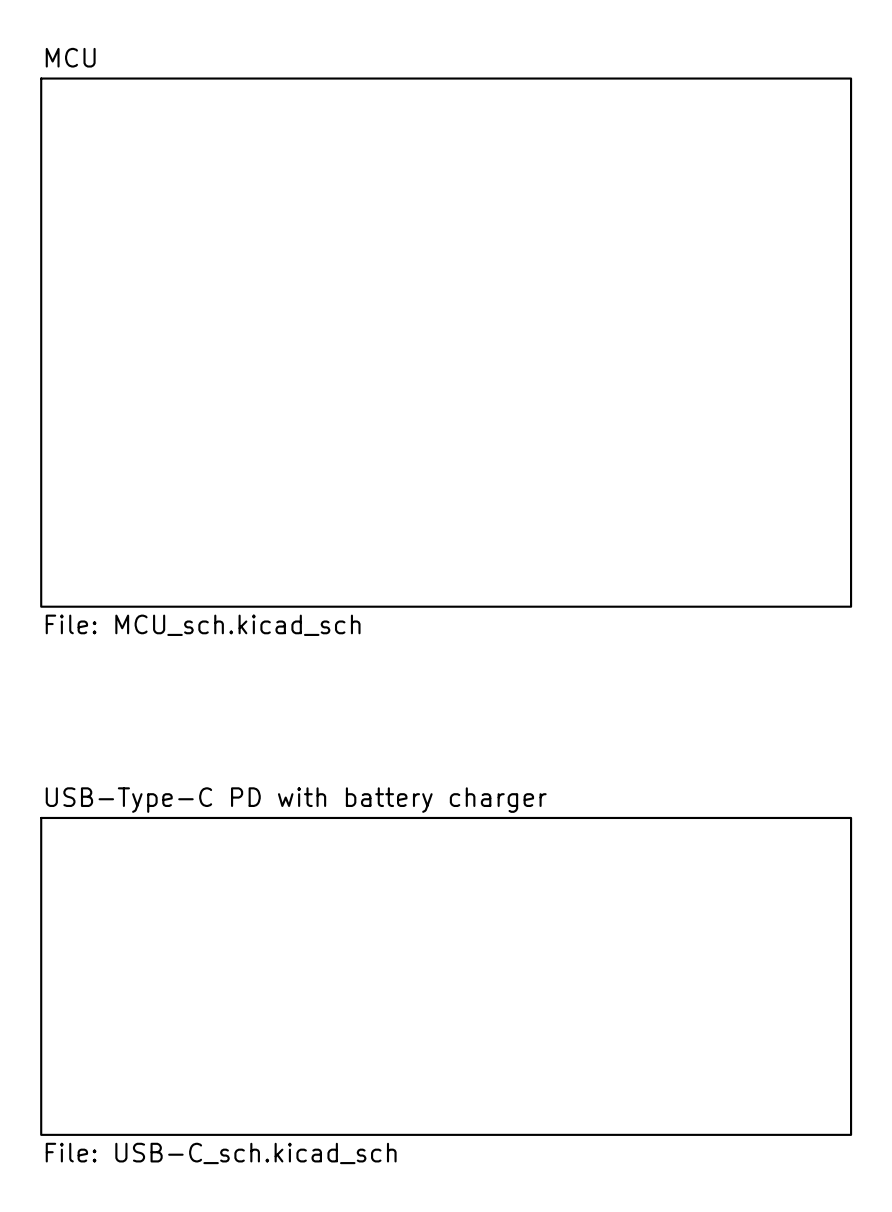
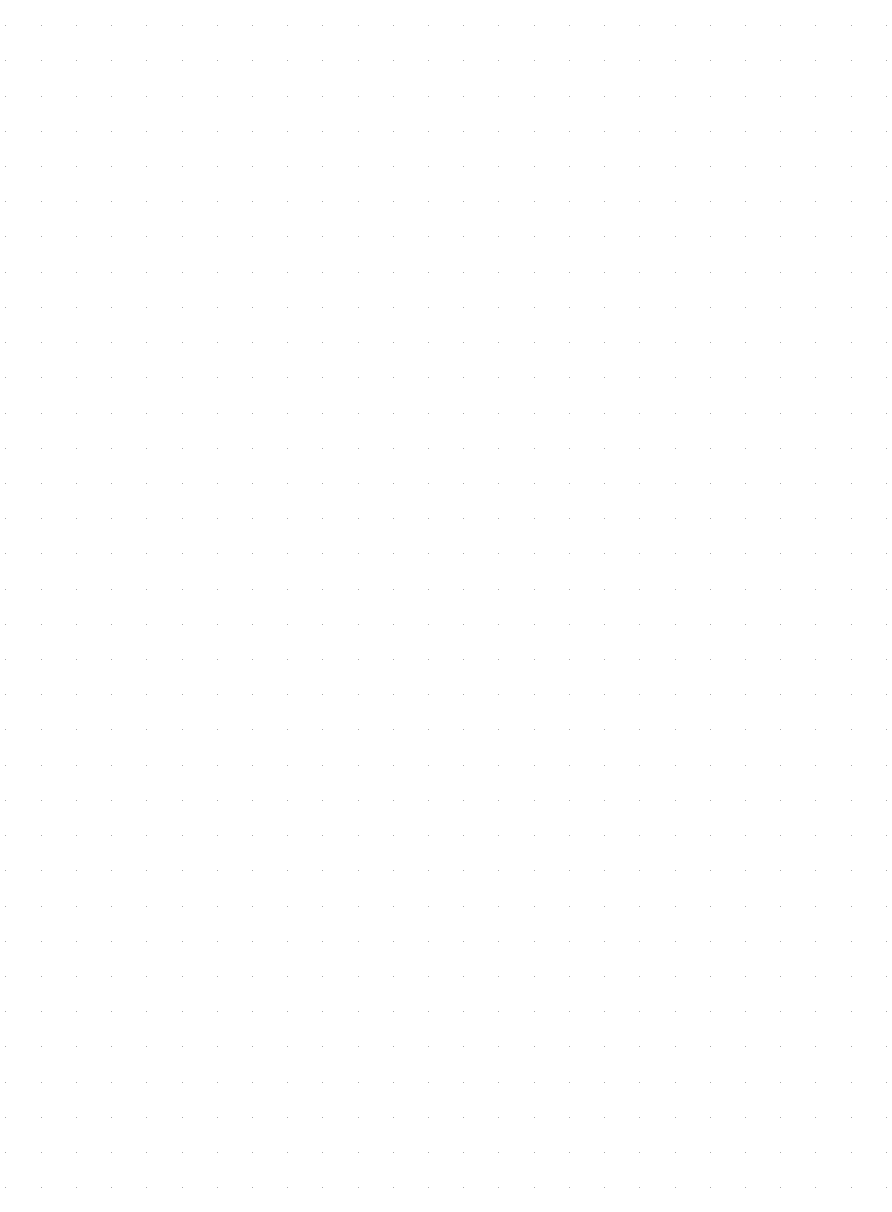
sheet MCU: File: MCU_sch.kicad_sch (446, 342) -> none
sheet USB-Type-C PD with battery charger: File: USB-C_sch.kicad_sch (446, 976) -> none

